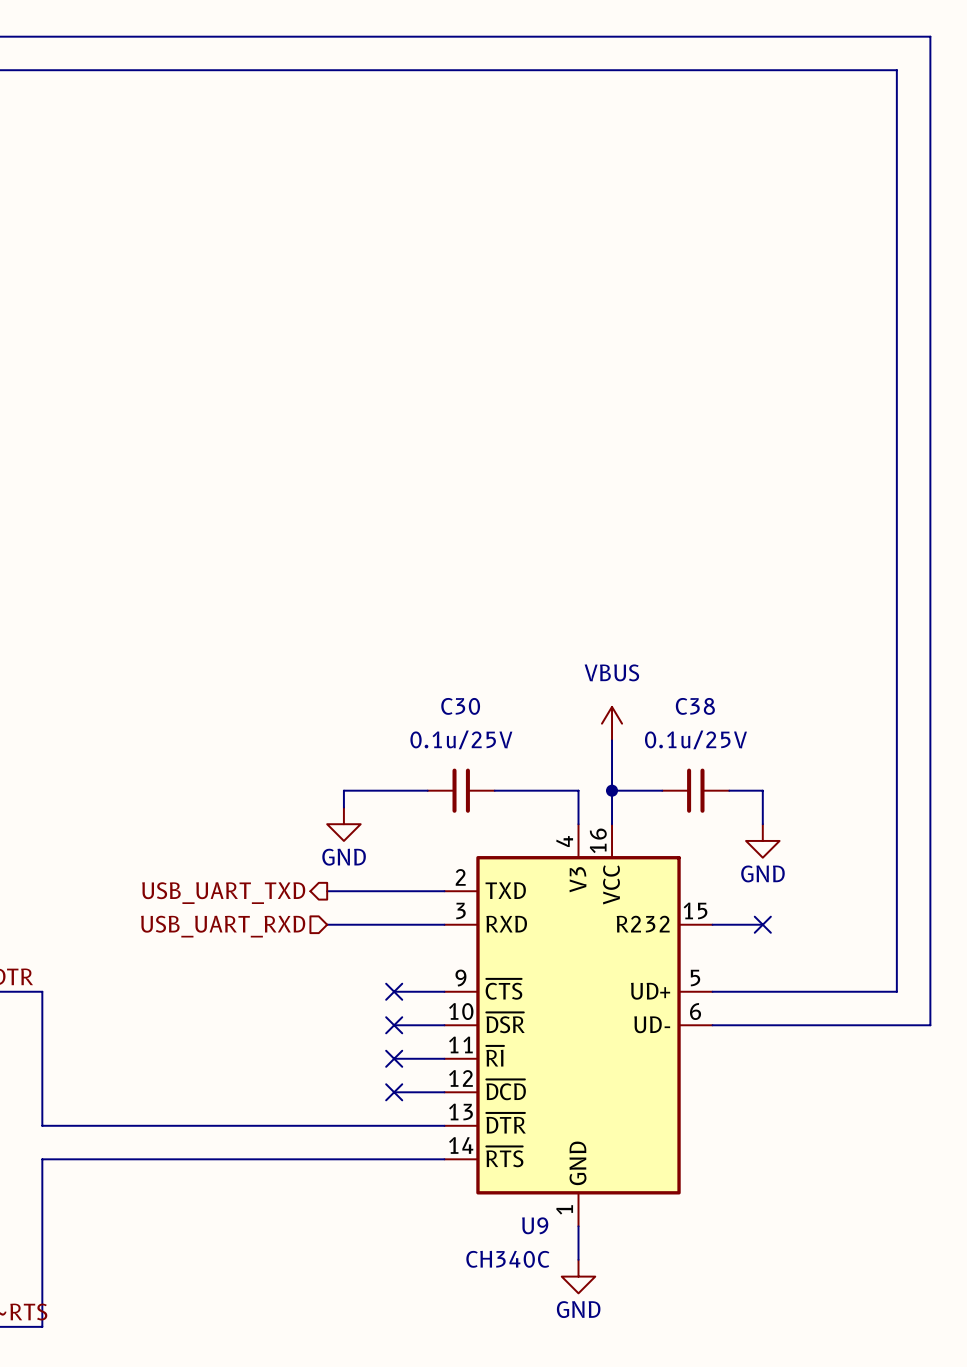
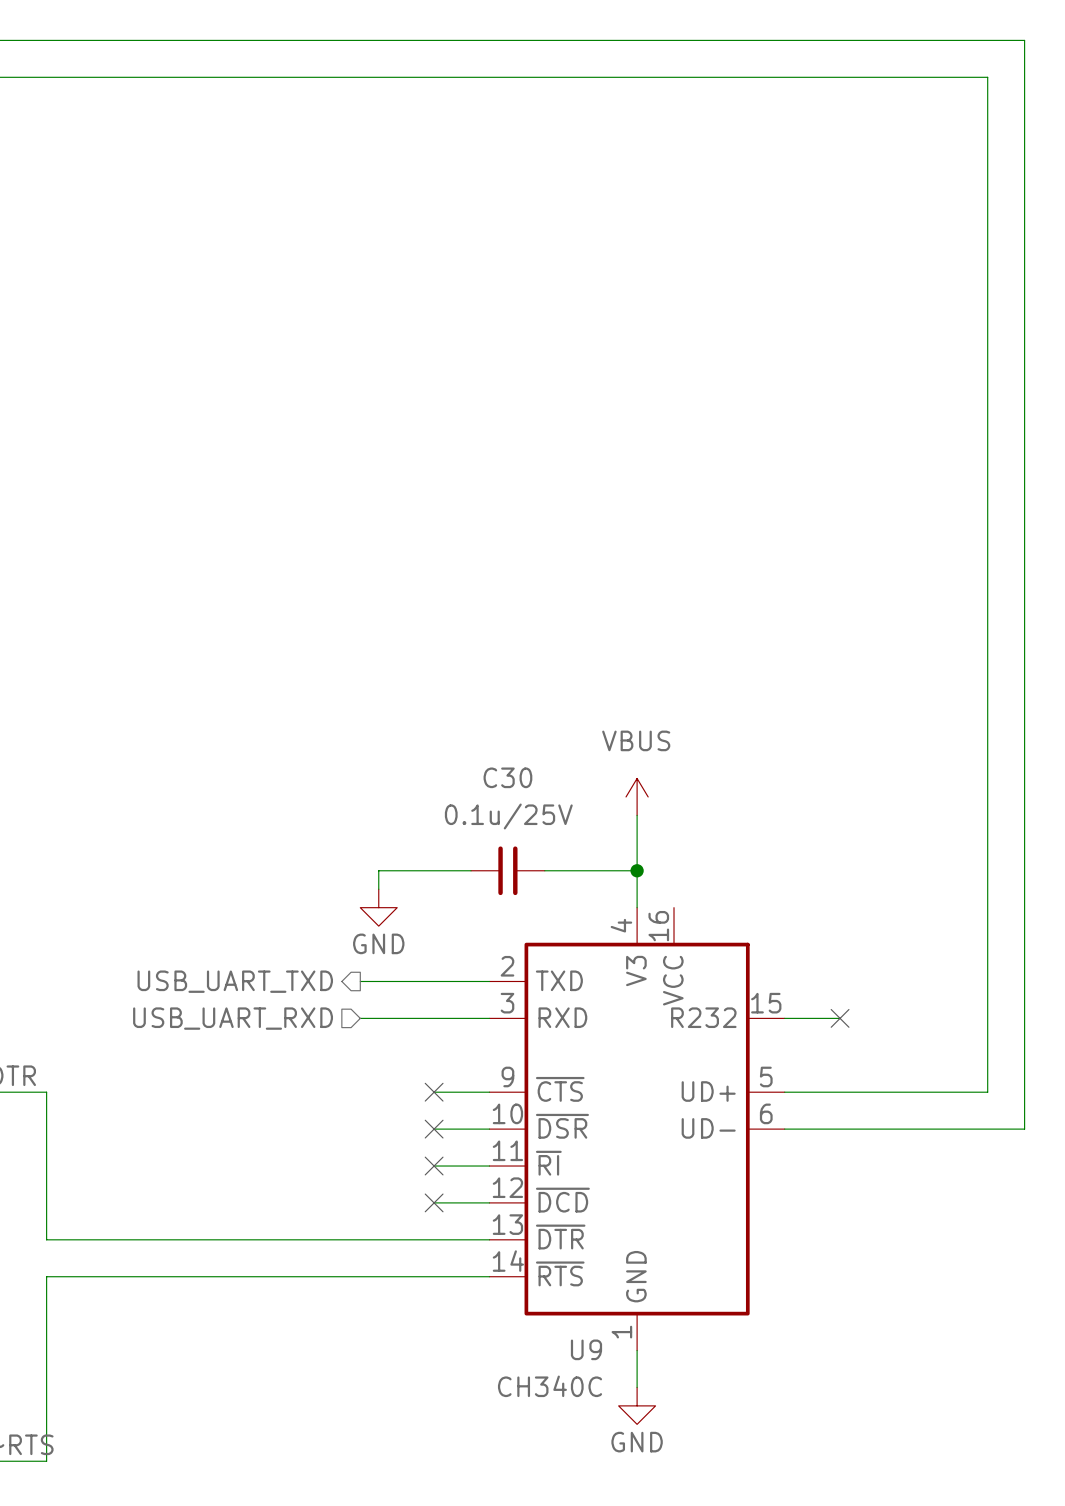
power symbol position: VBUS (612, 723) -> VBUS (637, 796)
wire: none -> (637, 815) (637, 870)
wire: (612, 740) (612, 824) -> none
wire: (612, 790) (662, 790) -> none
junction position: (612, 790) -> (637, 870)
C38: 0.1u/25V (695, 790) -> none
wire: (729, 790) (762, 790) (762, 824) -> none
power symbol: GND (762, 840) -> none

